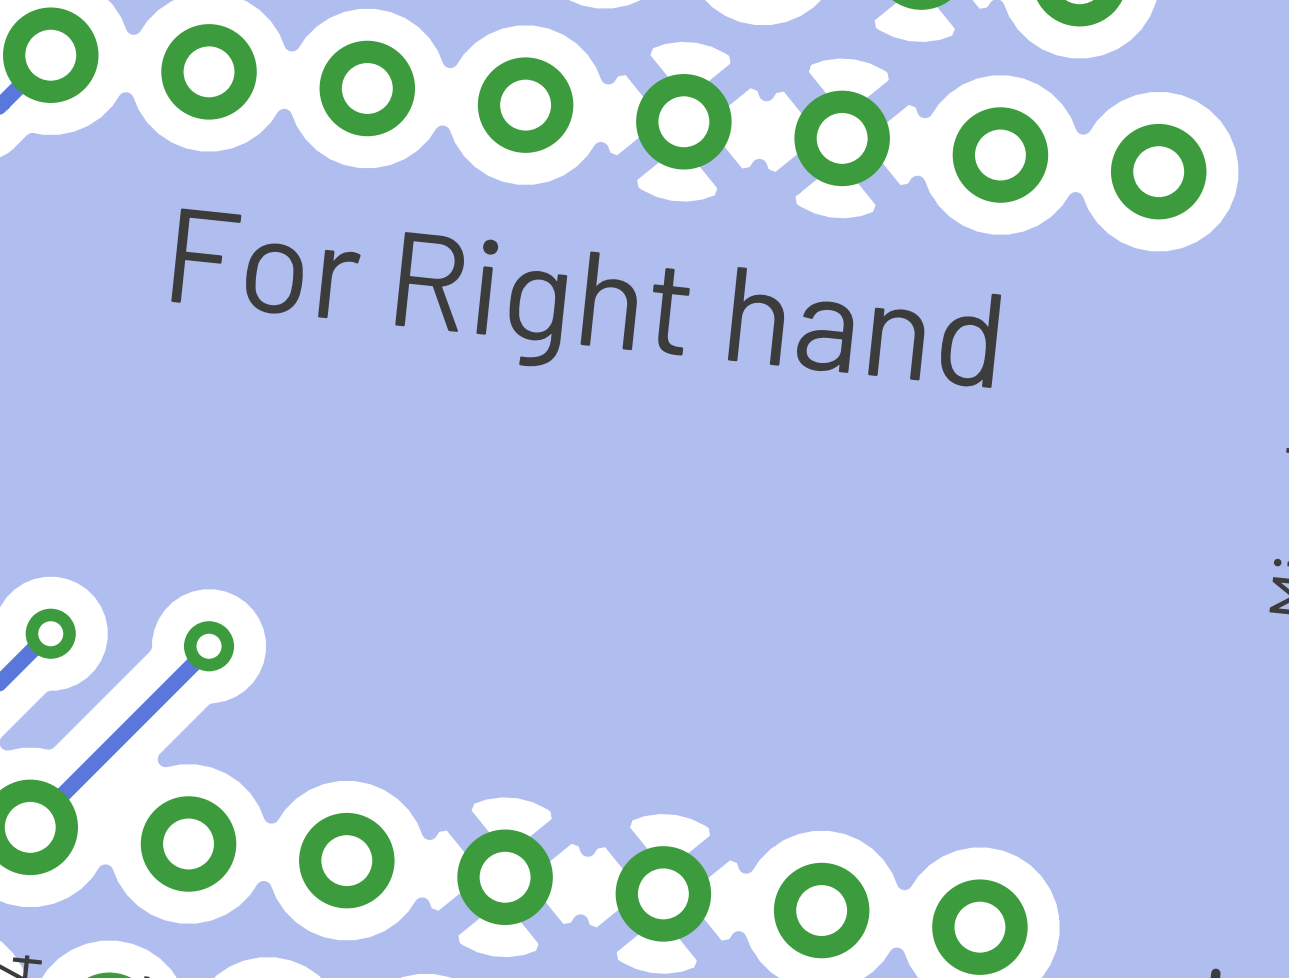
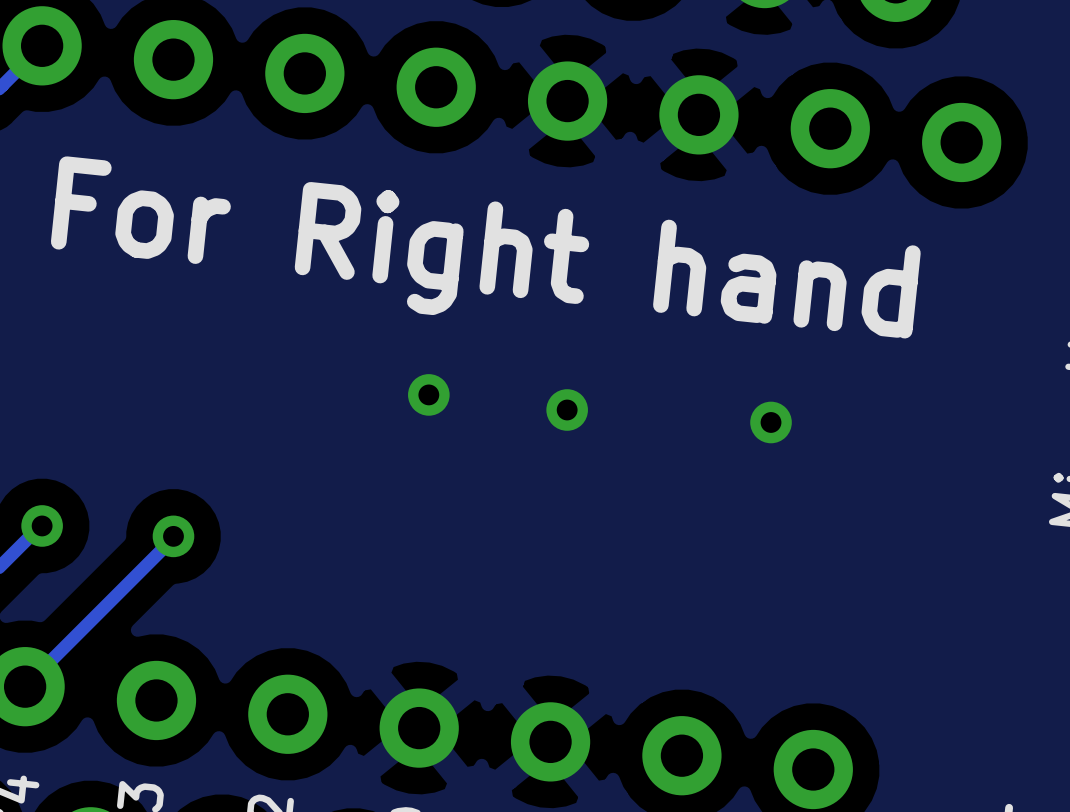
via: none -> (428, 394)
via: none -> (567, 410)
via: none -> (771, 422)

